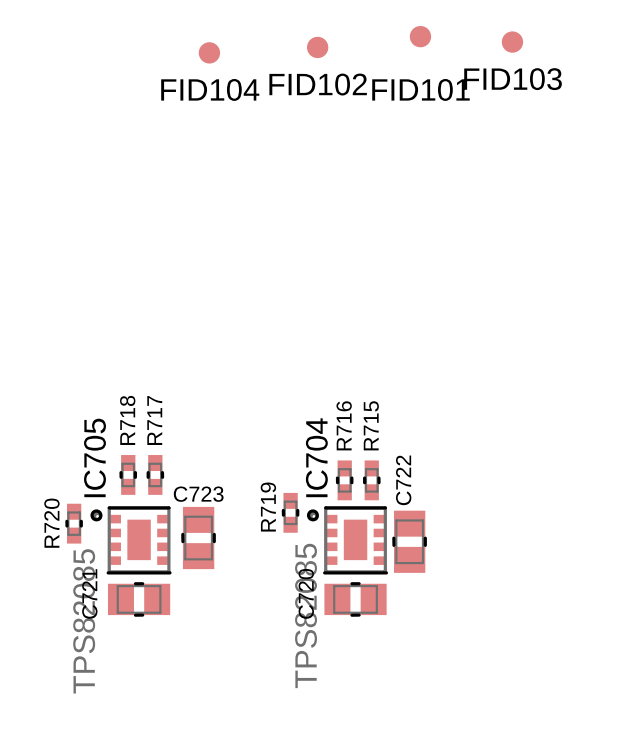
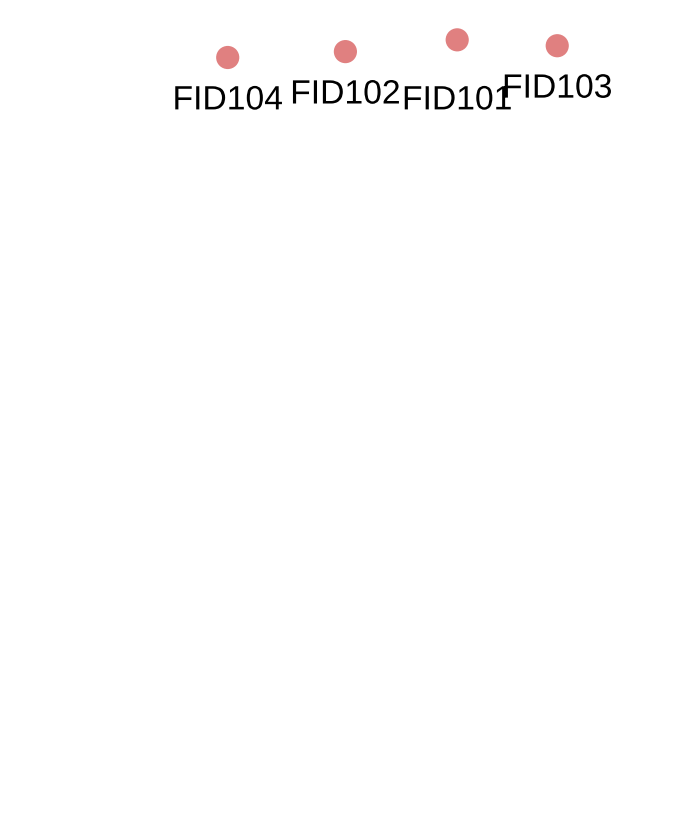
R718: (128, 474) -> none
R717: (155, 474) -> none
R716: (344, 480) -> none
R715: (371, 480) -> none
R719: (290, 512) -> none
R720: (74, 523) -> none
C723: (198, 538) -> none
IC705: TPS82085 (131, 540) -> none
IC704: TPS82085 (347, 540) -> none
C722: (409, 541) -> none
C721: (139, 599) -> none
C720: (355, 599) -> none

